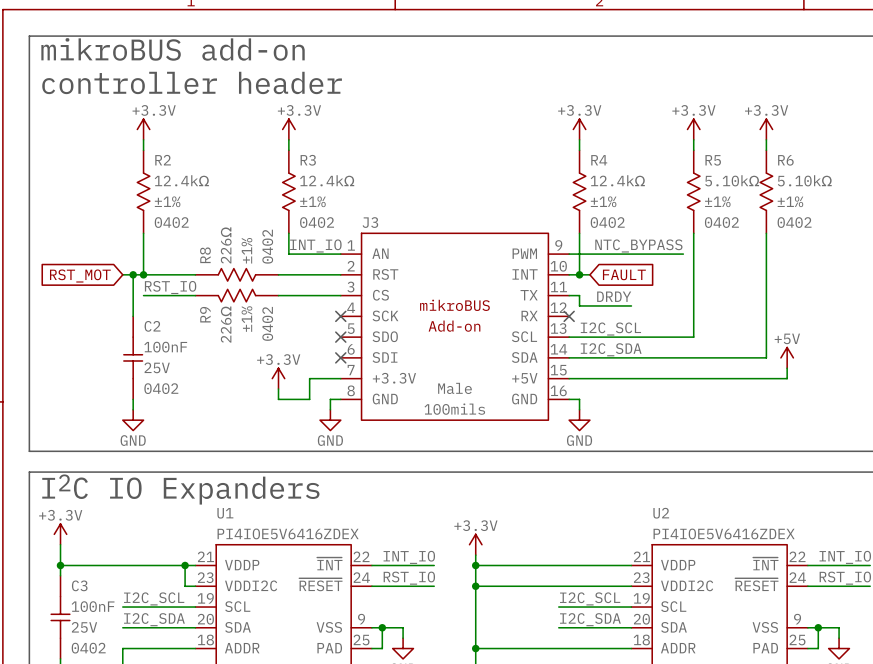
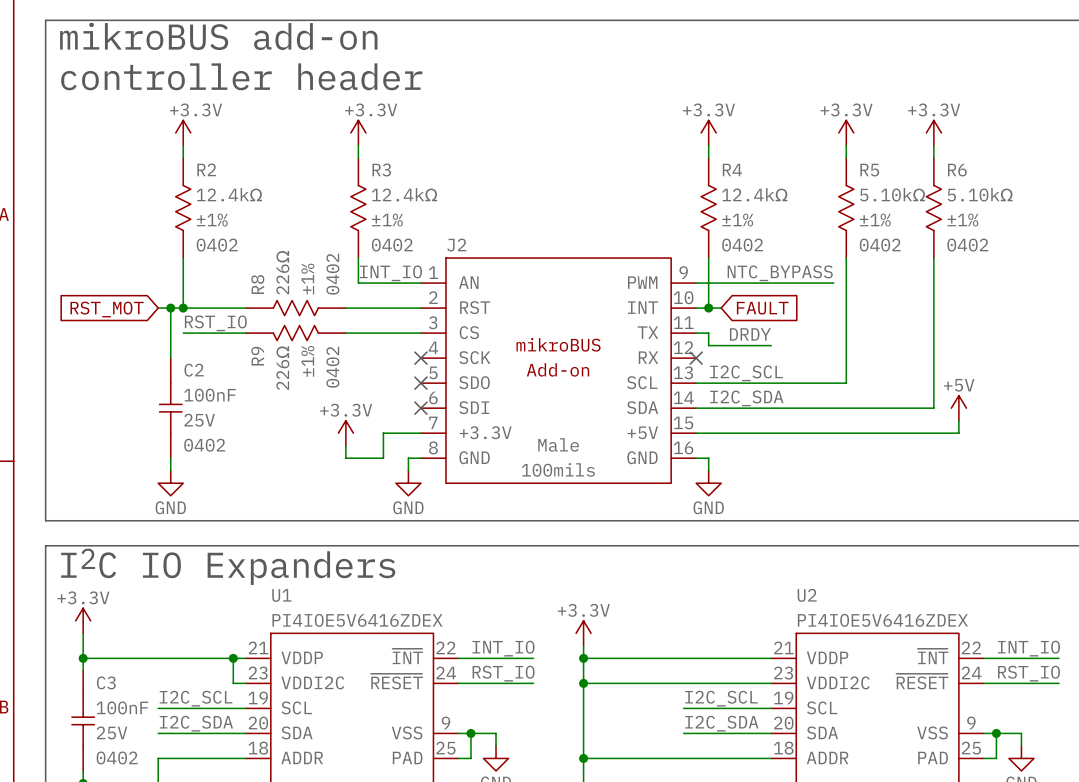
J3 name: J3 (370, 222) -> J2 (456, 245)

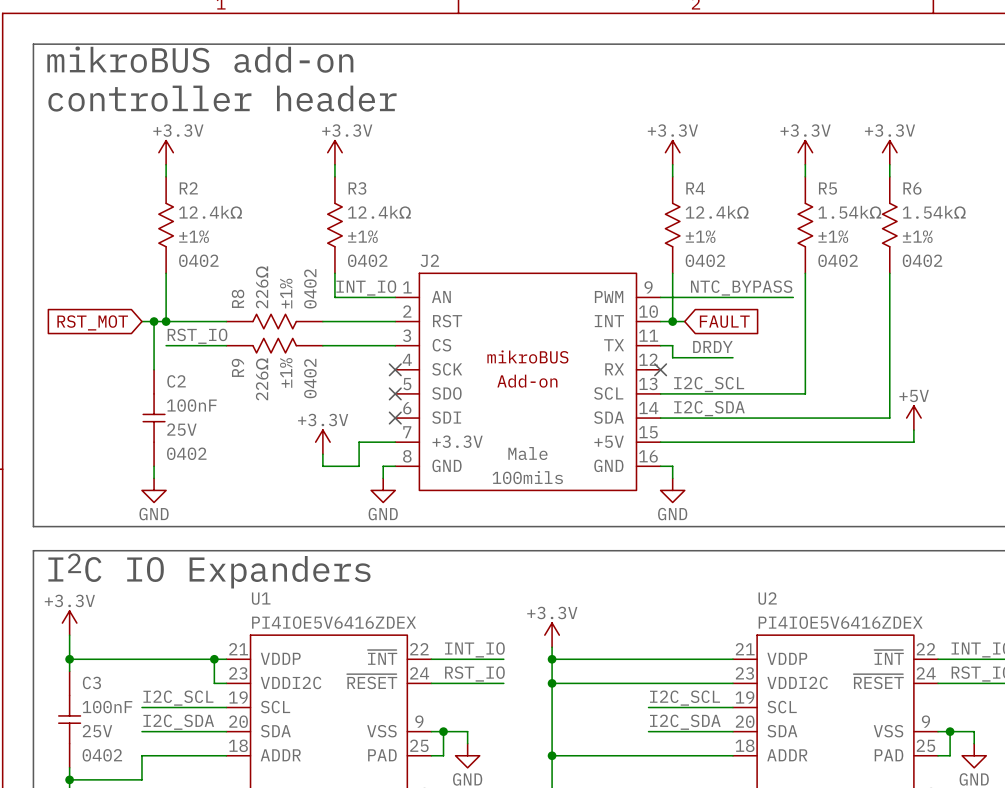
R5 text: 5.10kΩ (892, 194) -> 1.54kΩ (849, 212)
R6 text: 5.10kΩ (980, 194) -> 1.54kΩ (934, 212)

